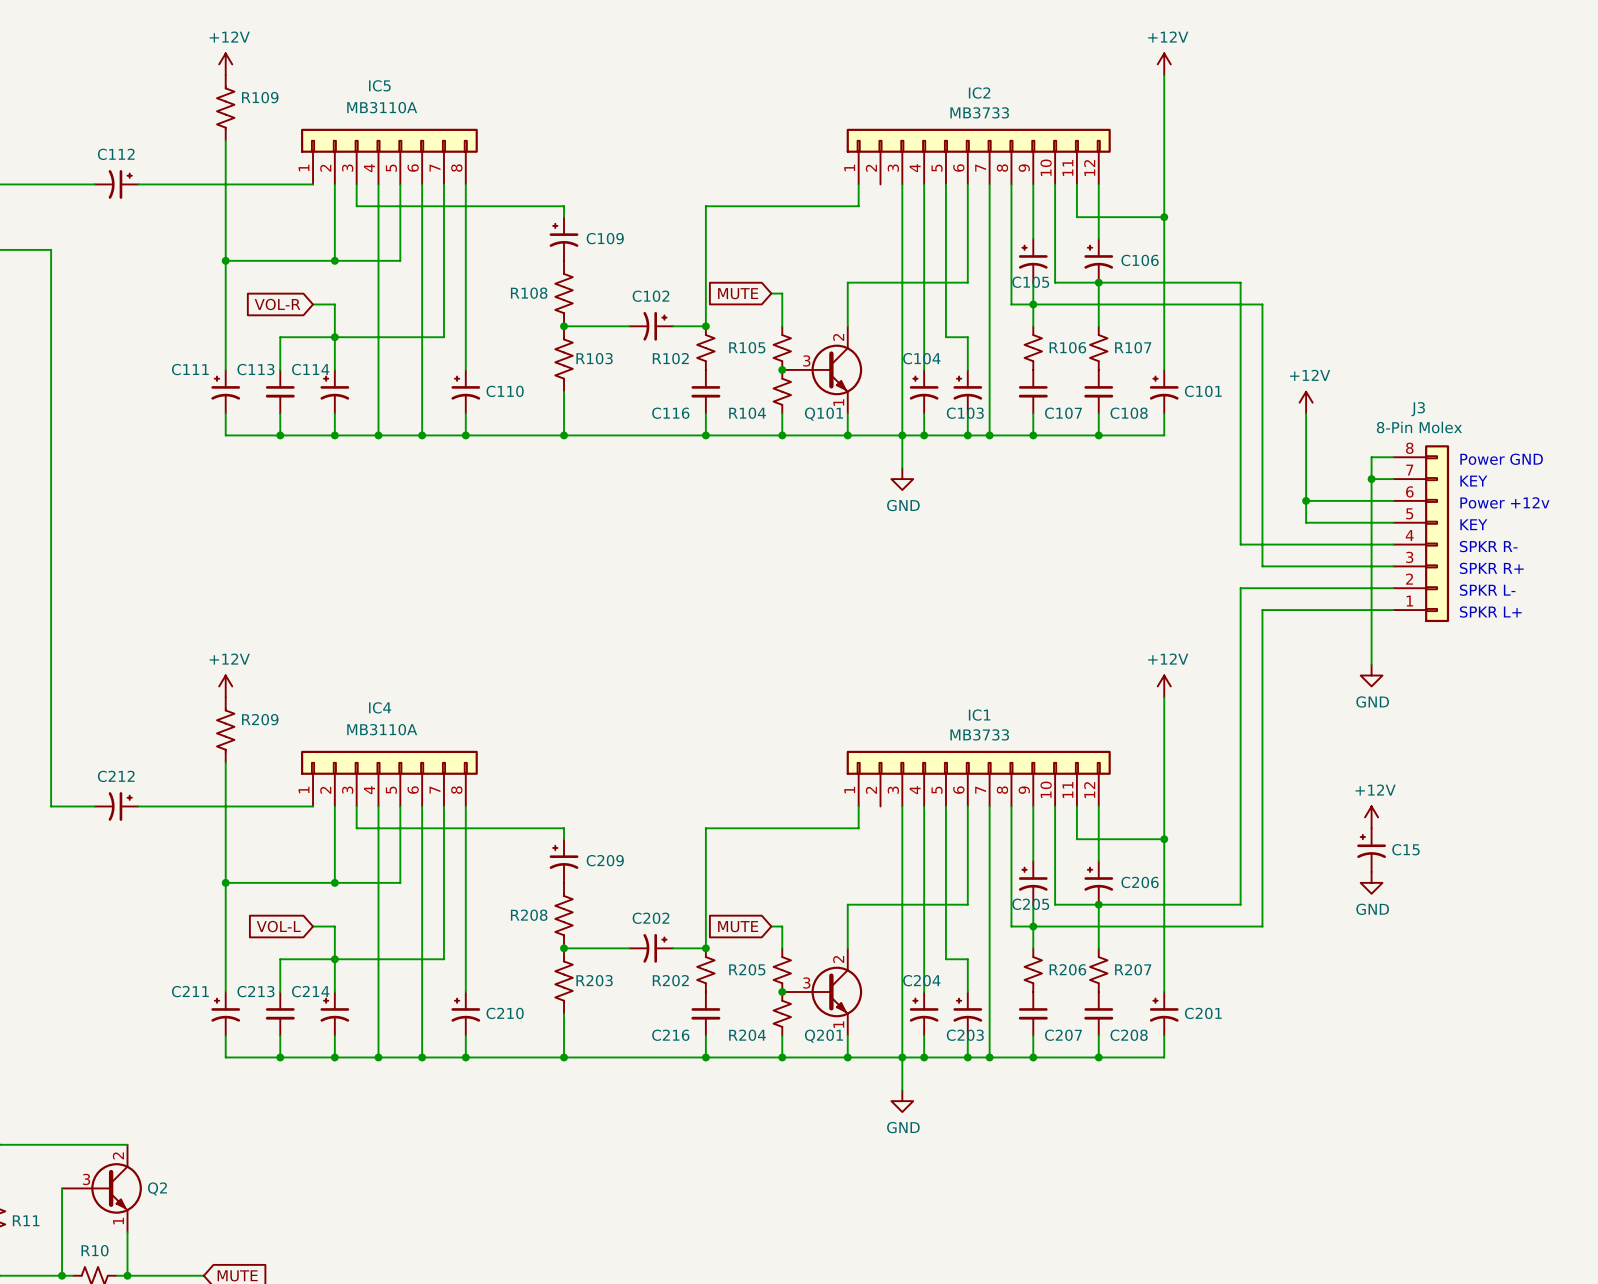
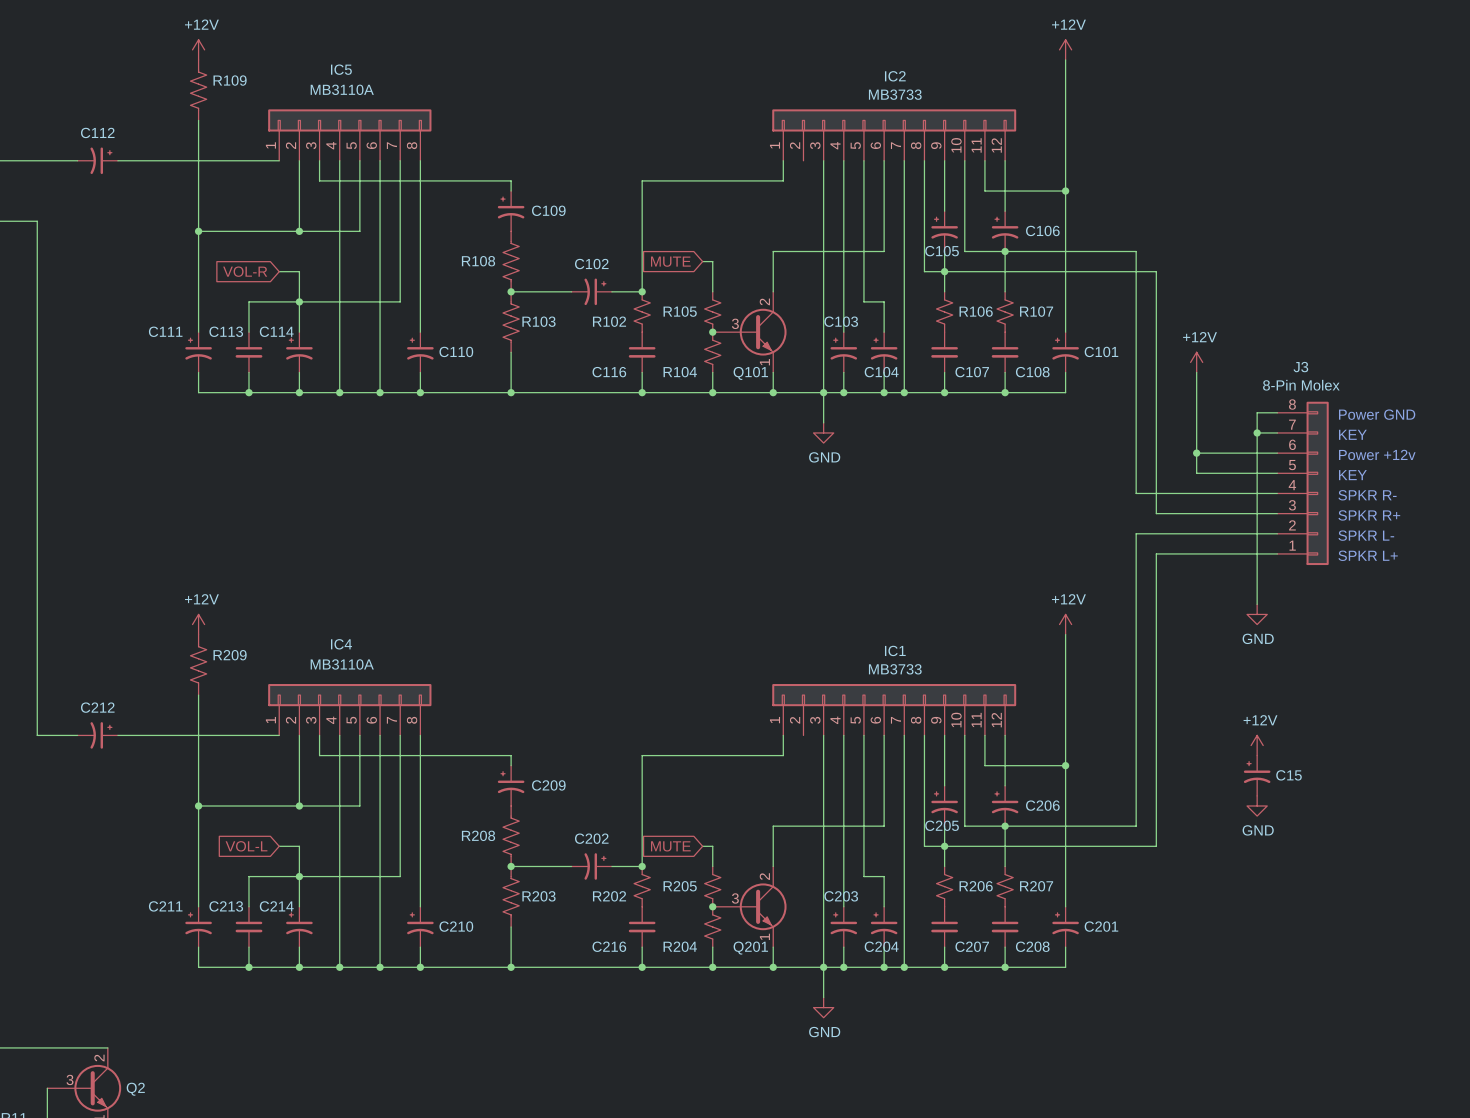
C104 name: C104 (921, 358) -> C103 (841, 321)
C103 name: C103 (965, 413) -> C104 (881, 372)
C204 name: C204 (921, 980) -> C203 (841, 896)
C203 name: C203 (965, 1035) -> C204 (881, 946)

